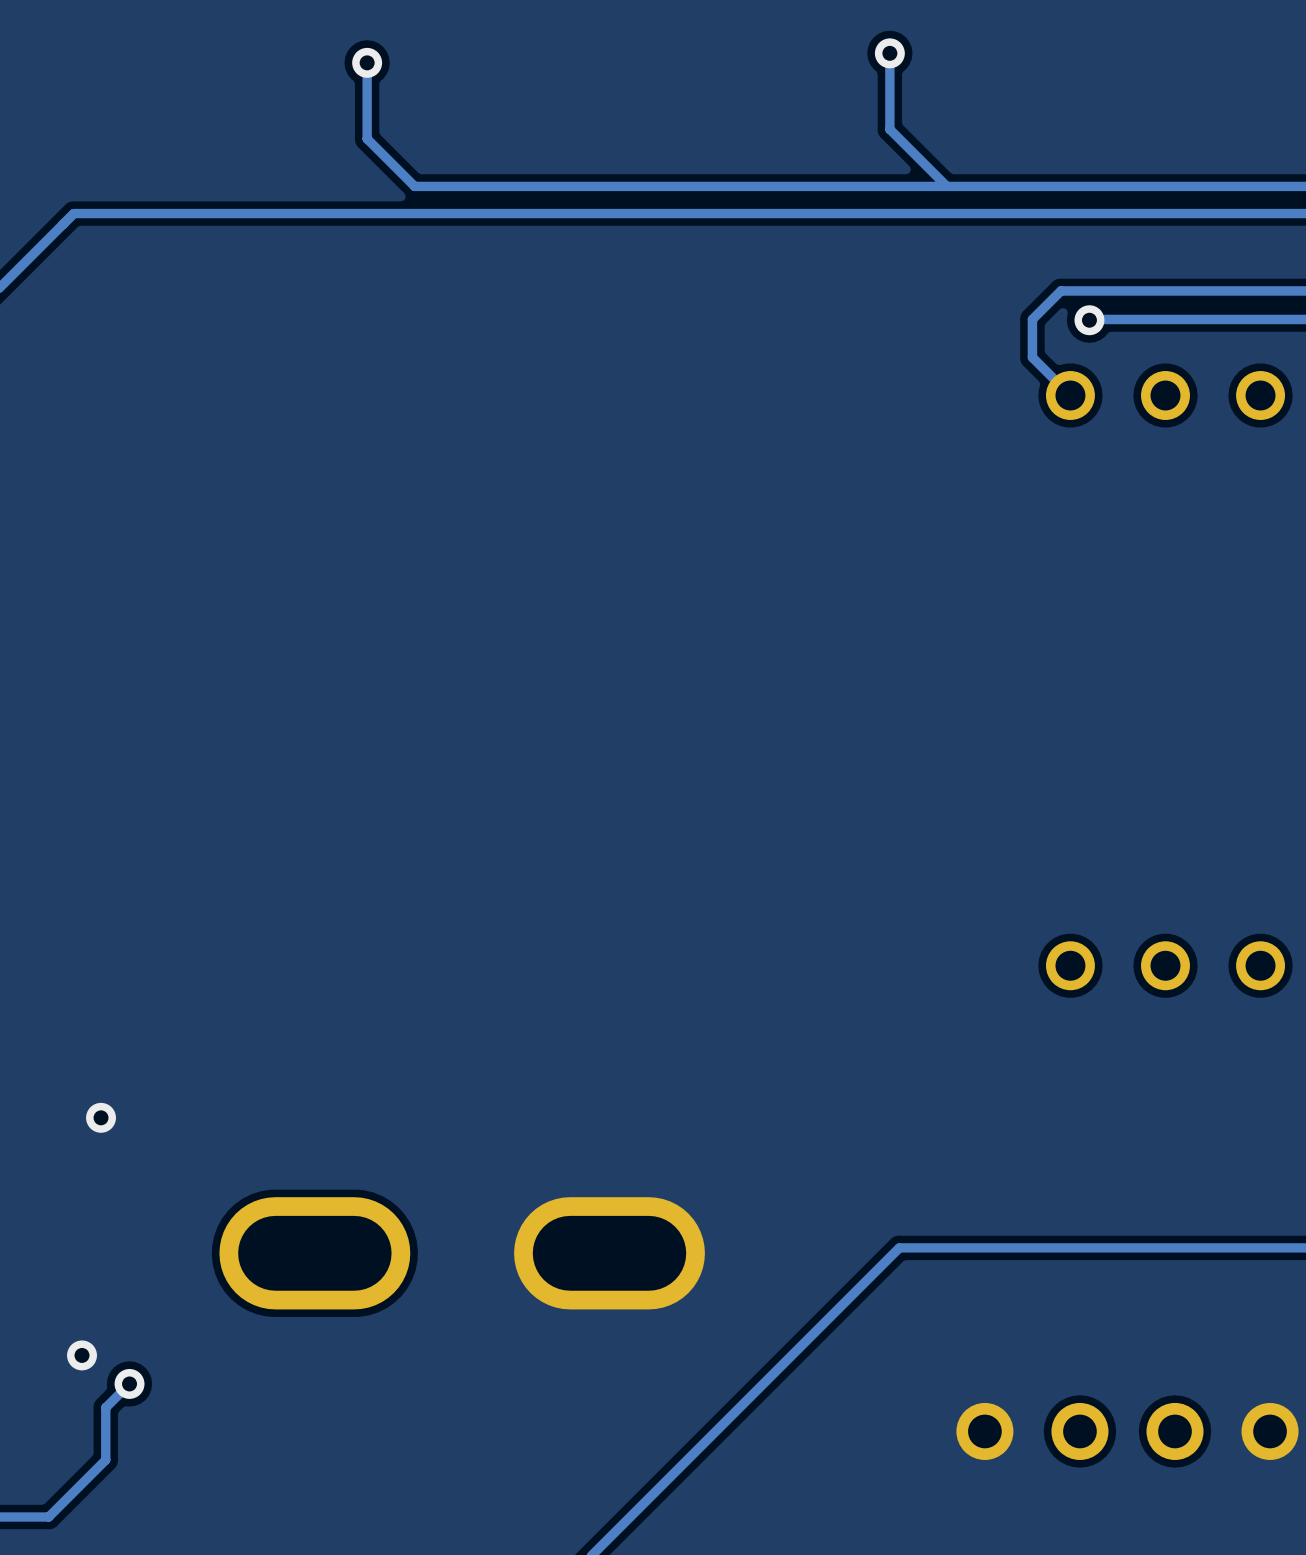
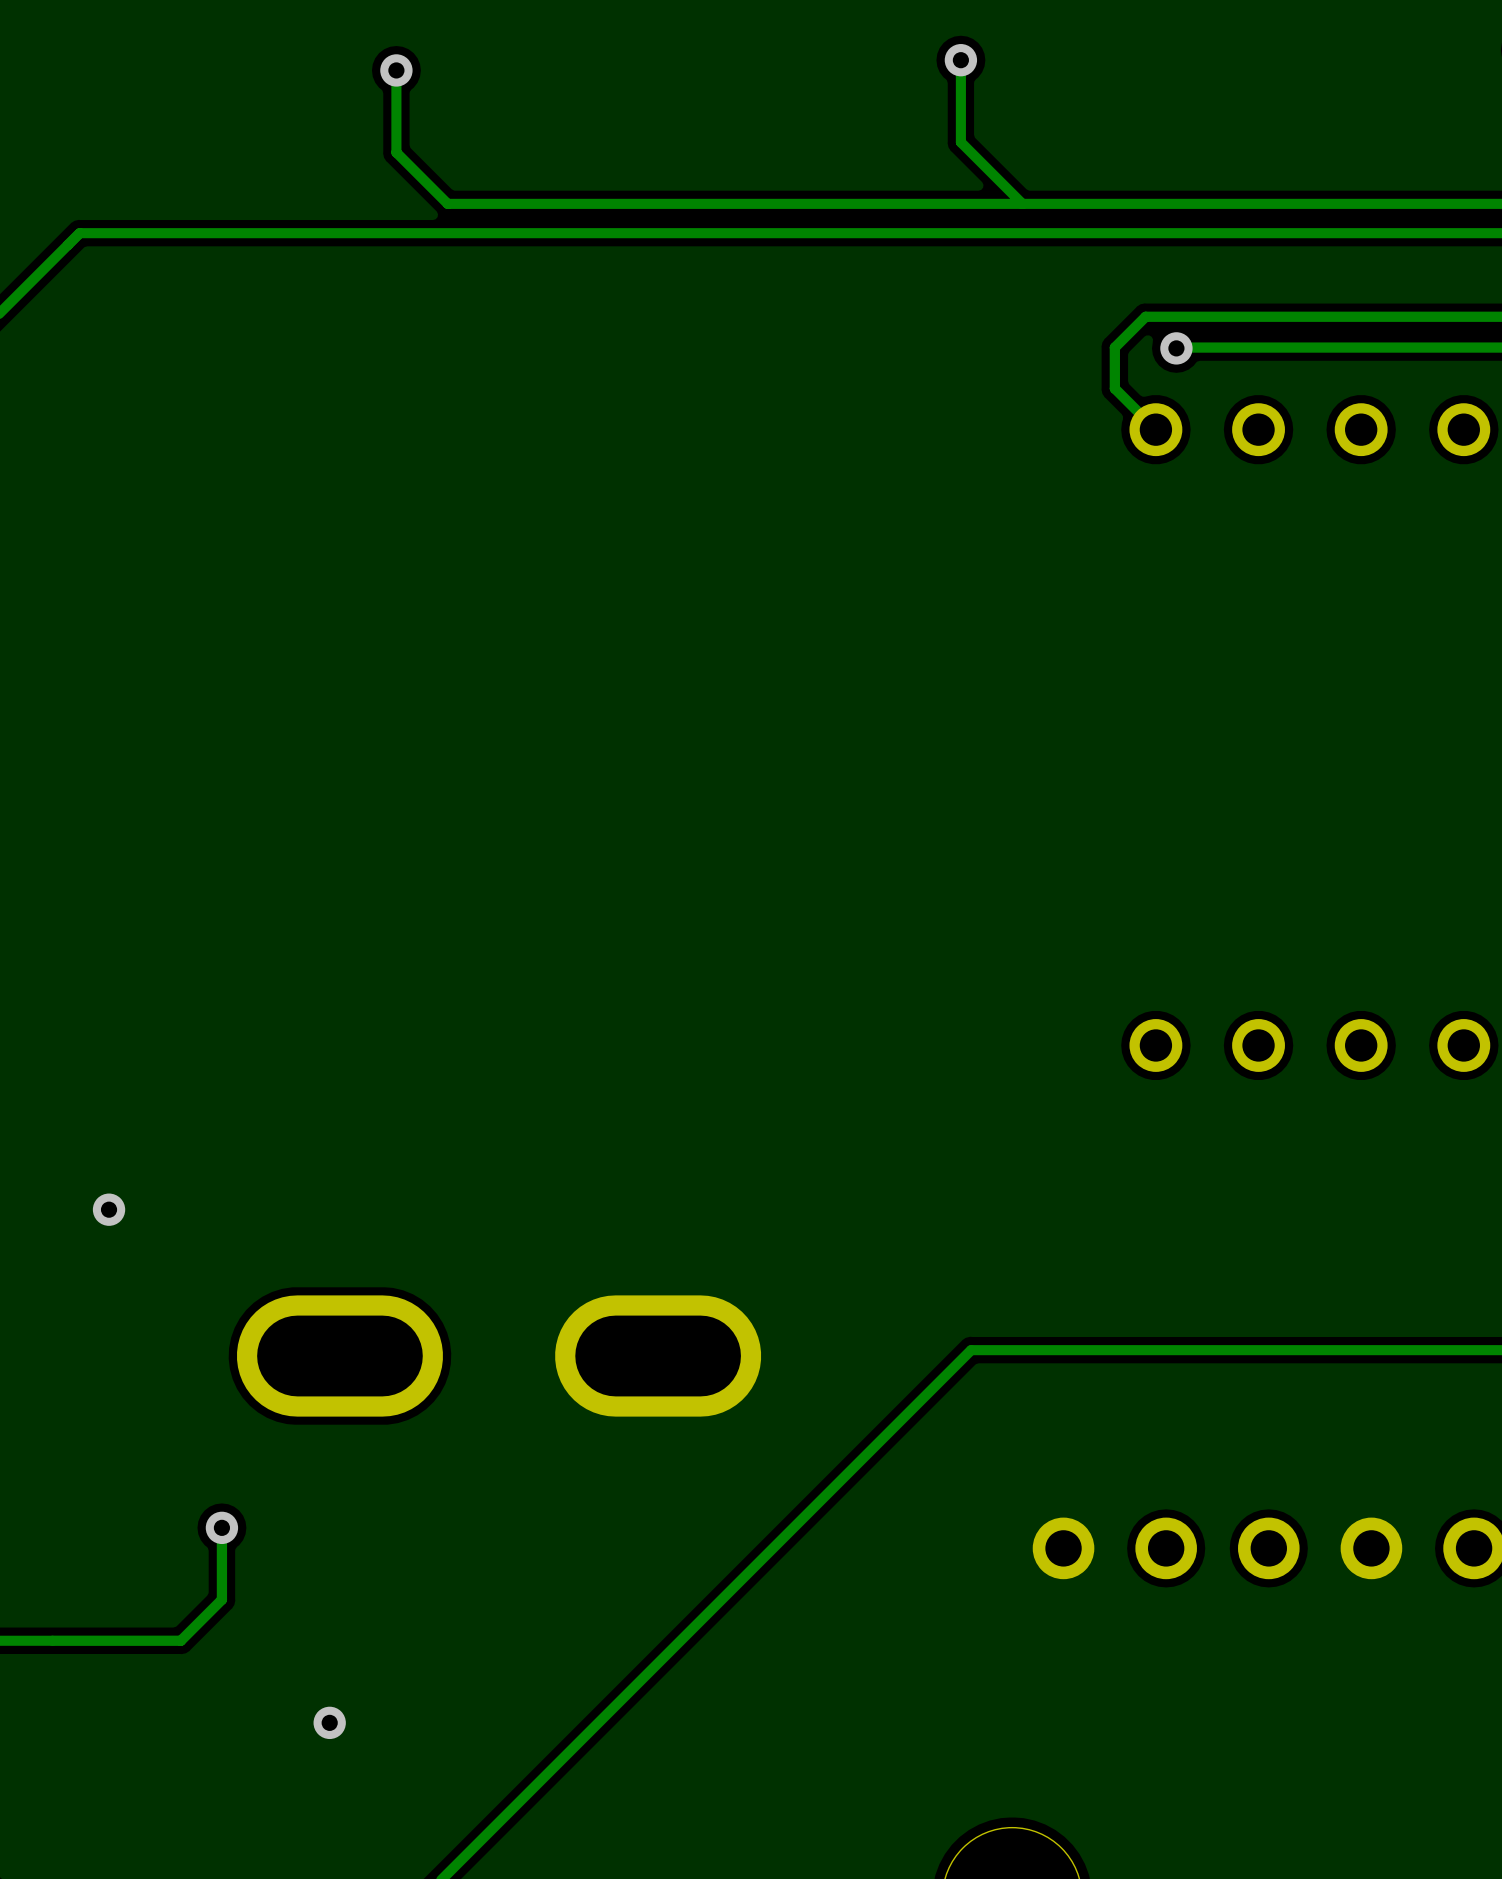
via: (82, 1355) -> none
track: (129, 1383) (105, 1407) (105, 1459) (48, 1517) -> (221, 1527) (221, 1599) (180, 1640) (52, 1640)
via: (129, 1383) -> none
via: none -> (221, 1527)

